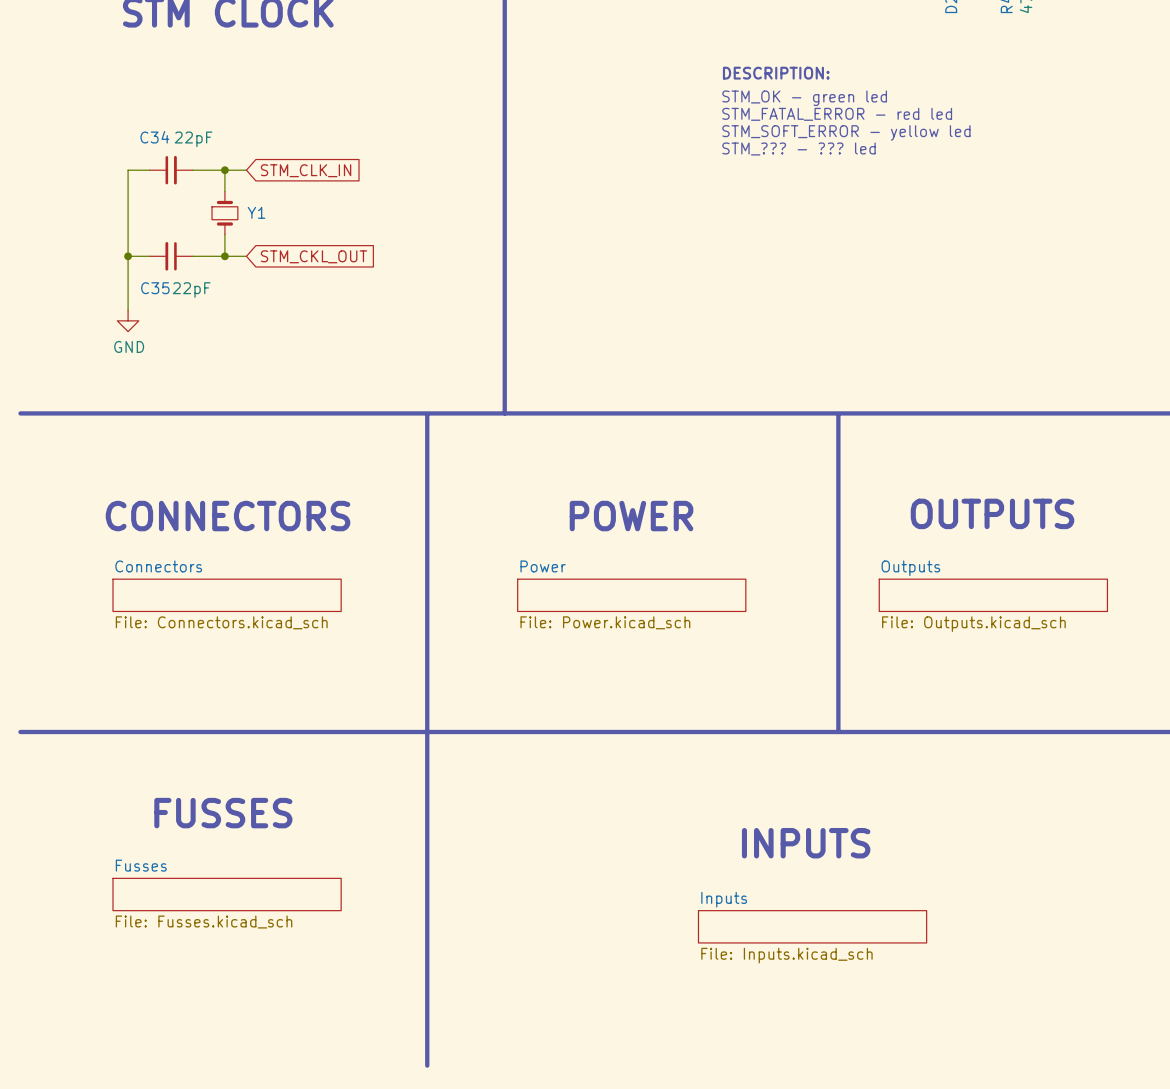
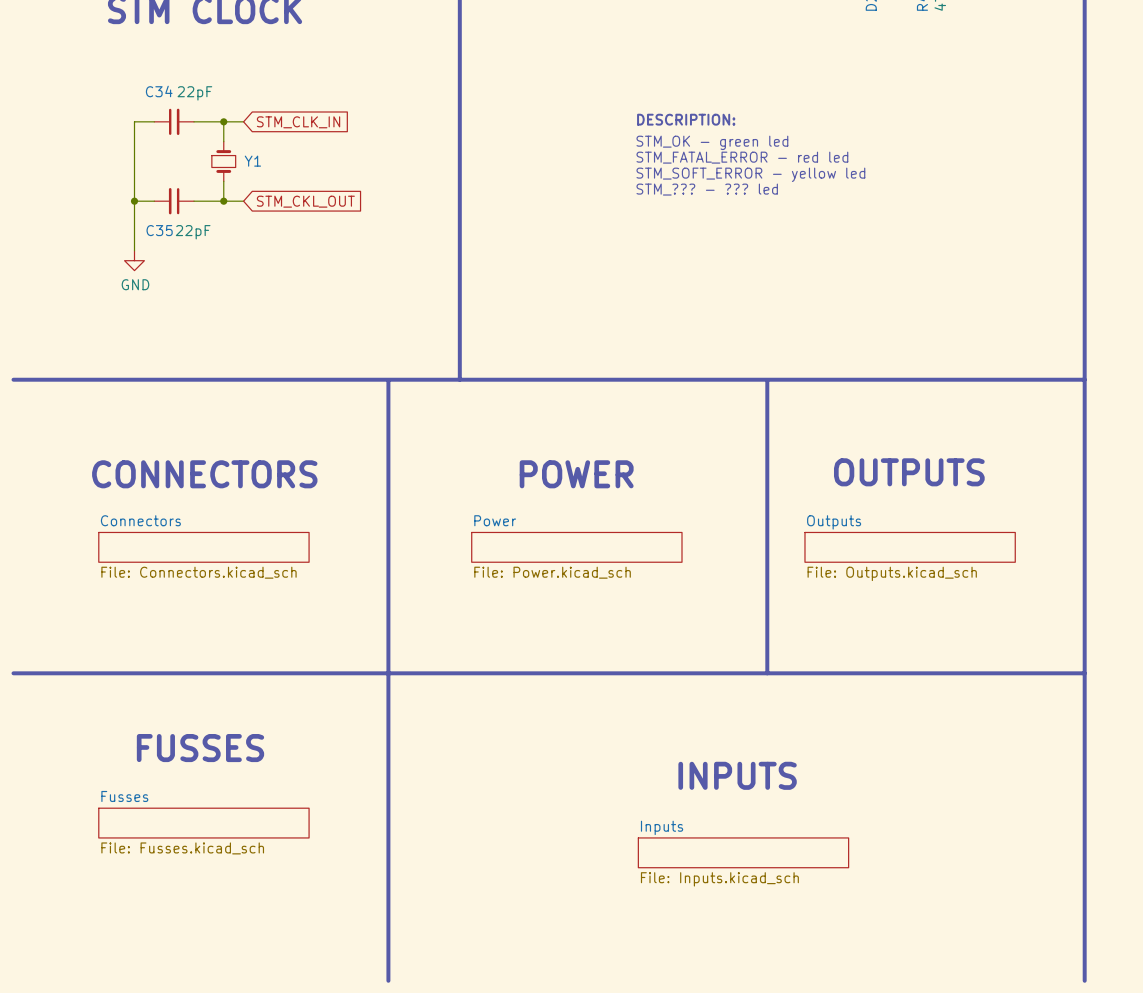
text position: DESCRIPTION: (776, 73) -> DESCRIPTION: (686, 119)
text position: STM_OK - green led (804, 98) -> STM_OK - green led (712, 142)
text position: STM_FATAL_ERROR - red led (837, 114) -> STM_FATAL_ERROR - red led (742, 157)
text position: STM_SOFT_ERROR - yellow led (846, 132) -> STM_SOFT_ERROR - yellow led (750, 174)
junction: none -> (223, 121)
text position: STM_??? - ??? led (799, 148) -> STM_??? - ??? led (707, 189)
wire: (149, 170) (128, 170) (128, 310) -> (154, 121) (134, 121) (134, 250)
C34 position: (171, 170) -> (174, 121)
wire: (192, 170) (246, 170) -> (194, 121) (243, 121)
wire: (224, 170) (224, 191) -> (223, 121) (223, 141)
junction: (224, 170) -> none
global label position: STM_CLK_IN (306, 170) -> STM_CLK_IN (298, 122)
Y1 position: (224, 213) -> (223, 161)
junction: none -> (134, 201)
junction: none -> (223, 201)
wire: (224, 234) (224, 256) -> (223, 181) (223, 201)
wire: (128, 256) (149, 256) -> (134, 201) (154, 201)
junction: (128, 256) -> none
C35 position: (171, 256) -> (174, 201)
wire: (192, 256) (246, 256) -> (194, 201) (243, 201)
junction: (224, 256) -> none
global label position: STM_CKL_OUT (313, 256) -> STM_CKL_OUT (305, 201)
power symbol position: GND (128, 320) -> GND (134, 260)

